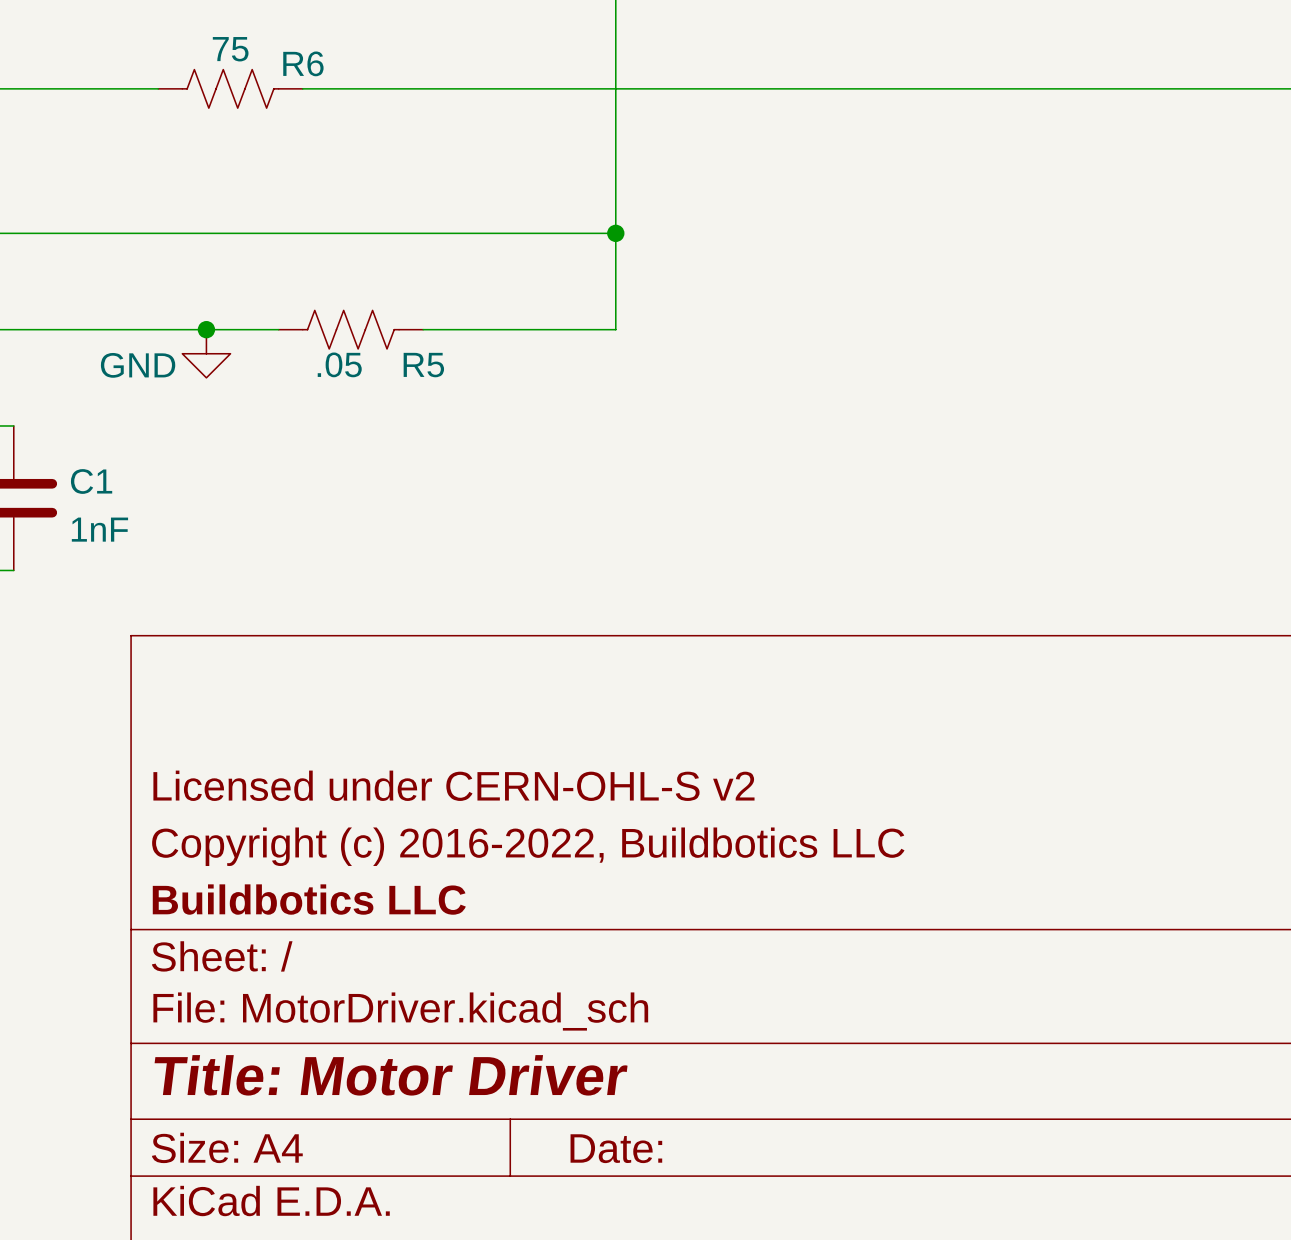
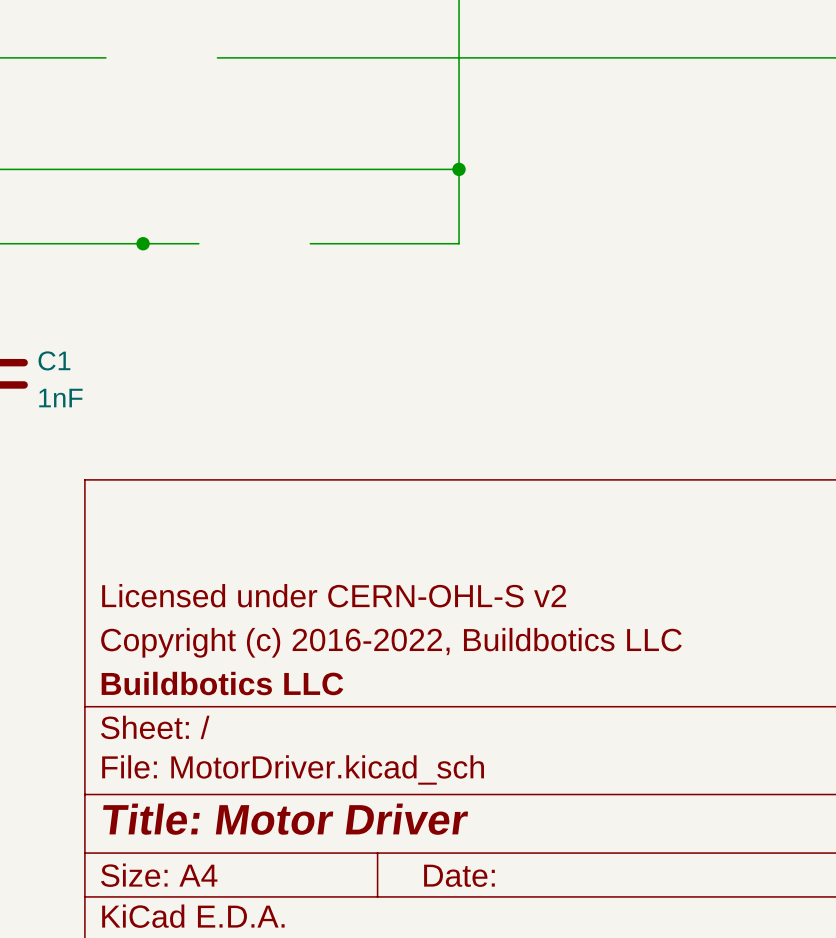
R6: 75 (230, 88) -> none
R5: .05 (350, 329) -> none
power symbol: GND (206, 353) -> none

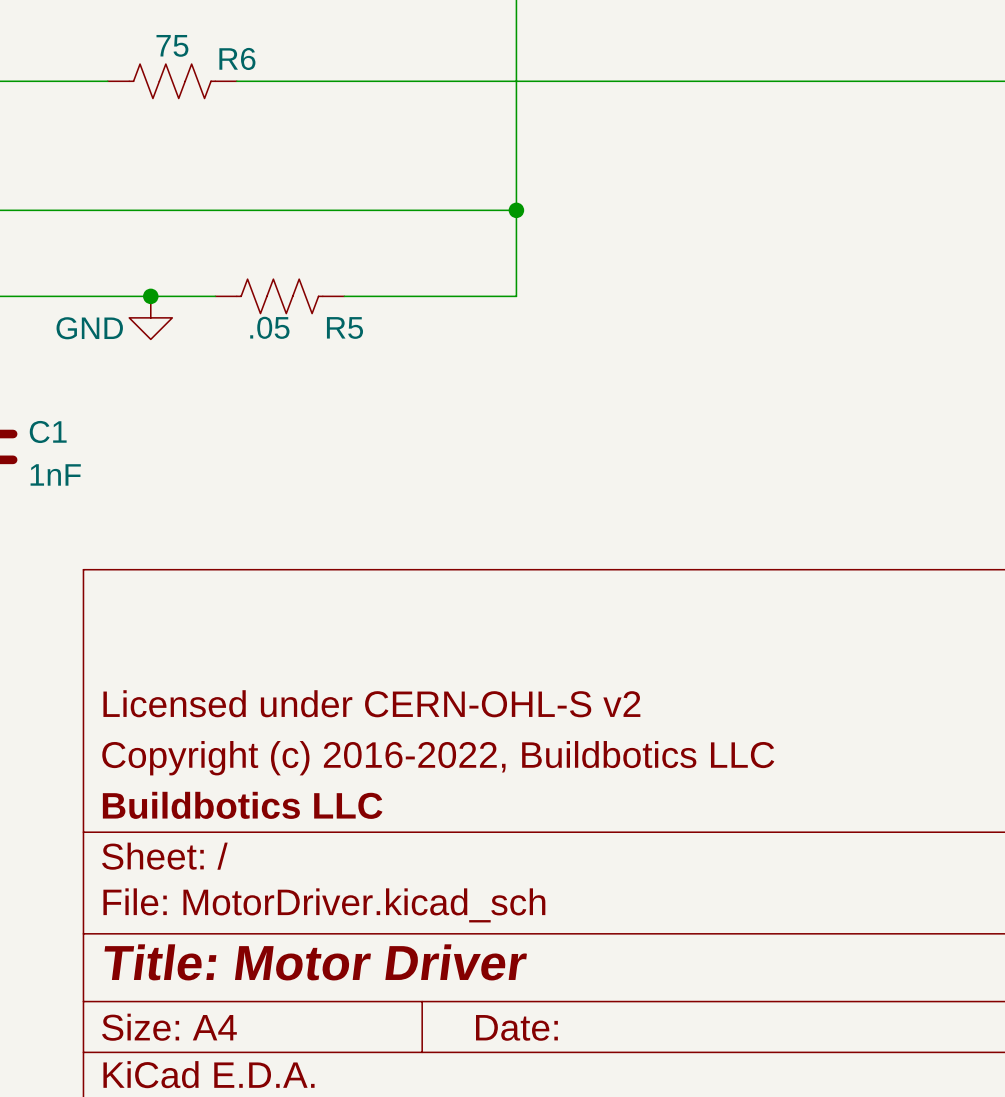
R6: none -> 75 (172, 81)
R5: none -> .05 (279, 296)
power symbol: none -> GND (150, 317)

